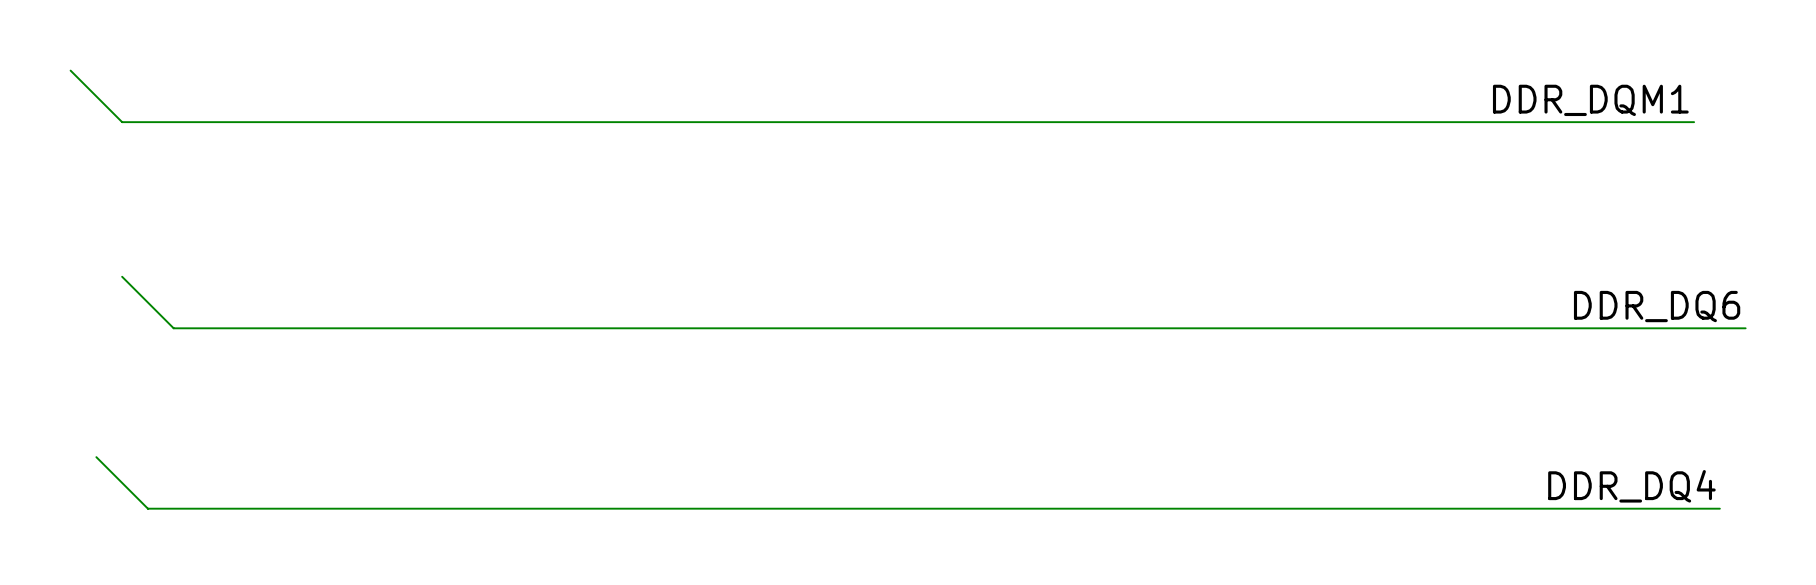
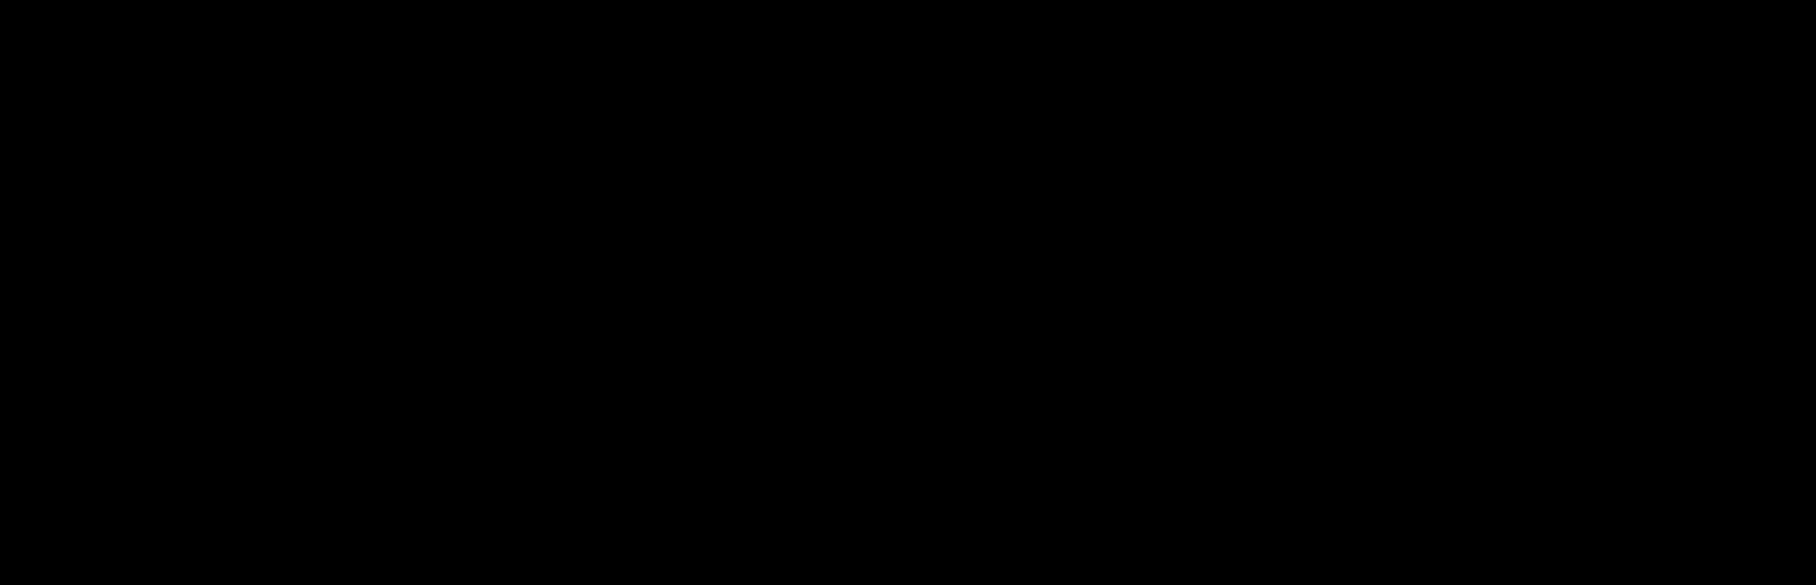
wire: (70, 70) (122, 122) (1694, 122) -> none
label: DDR_DQM1 (1590, 100) -> none
wire: (122, 276) (173, 328) (1745, 328) -> none
label: DDR_DQ6 (1657, 306) -> none
wire: (96, 457) (147, 508) (1719, 508) -> none
label: DDR_DQ4 (1631, 486) -> none

